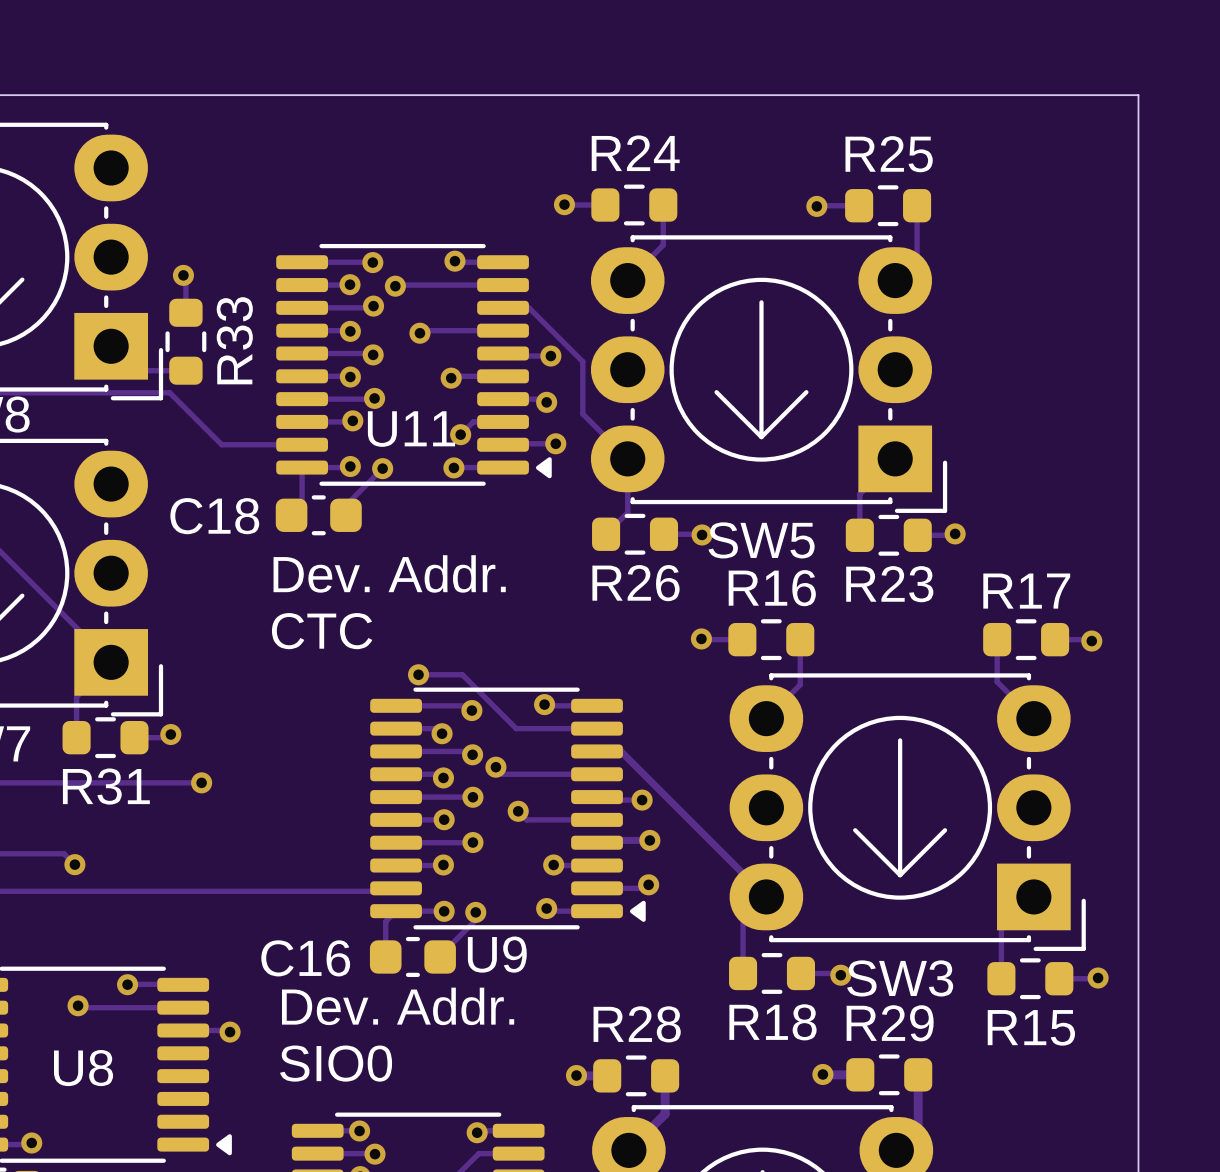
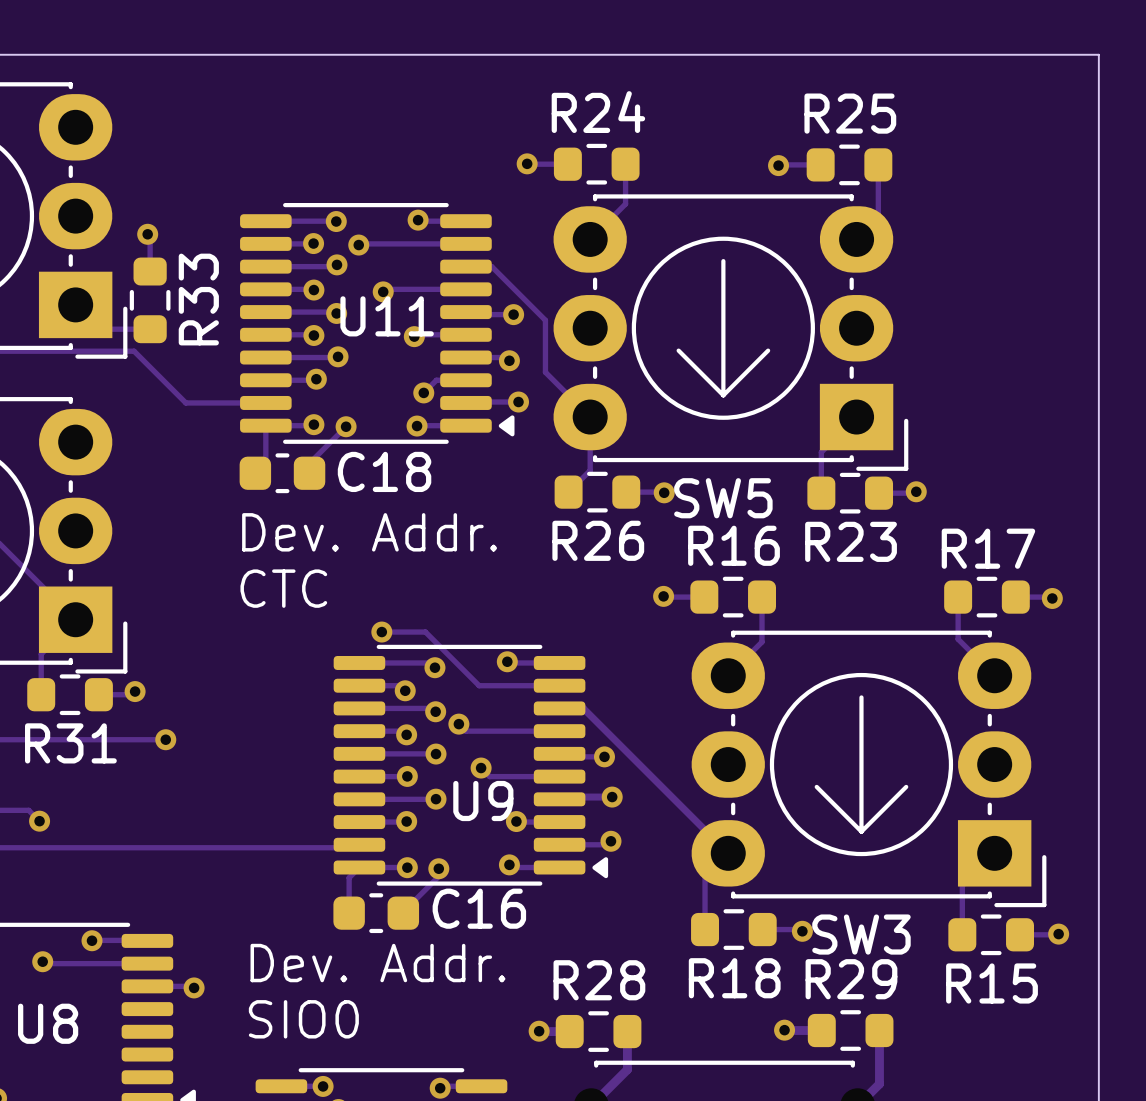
U11 name position: U11 (411, 429) -> U11 (387, 316)
C18 name position: C18 (214, 516) -> C18 (384, 471)
U9 name position: U9 (497, 954) -> U9 (483, 801)
C16 name position: C16 (305, 958) -> C16 (479, 908)

